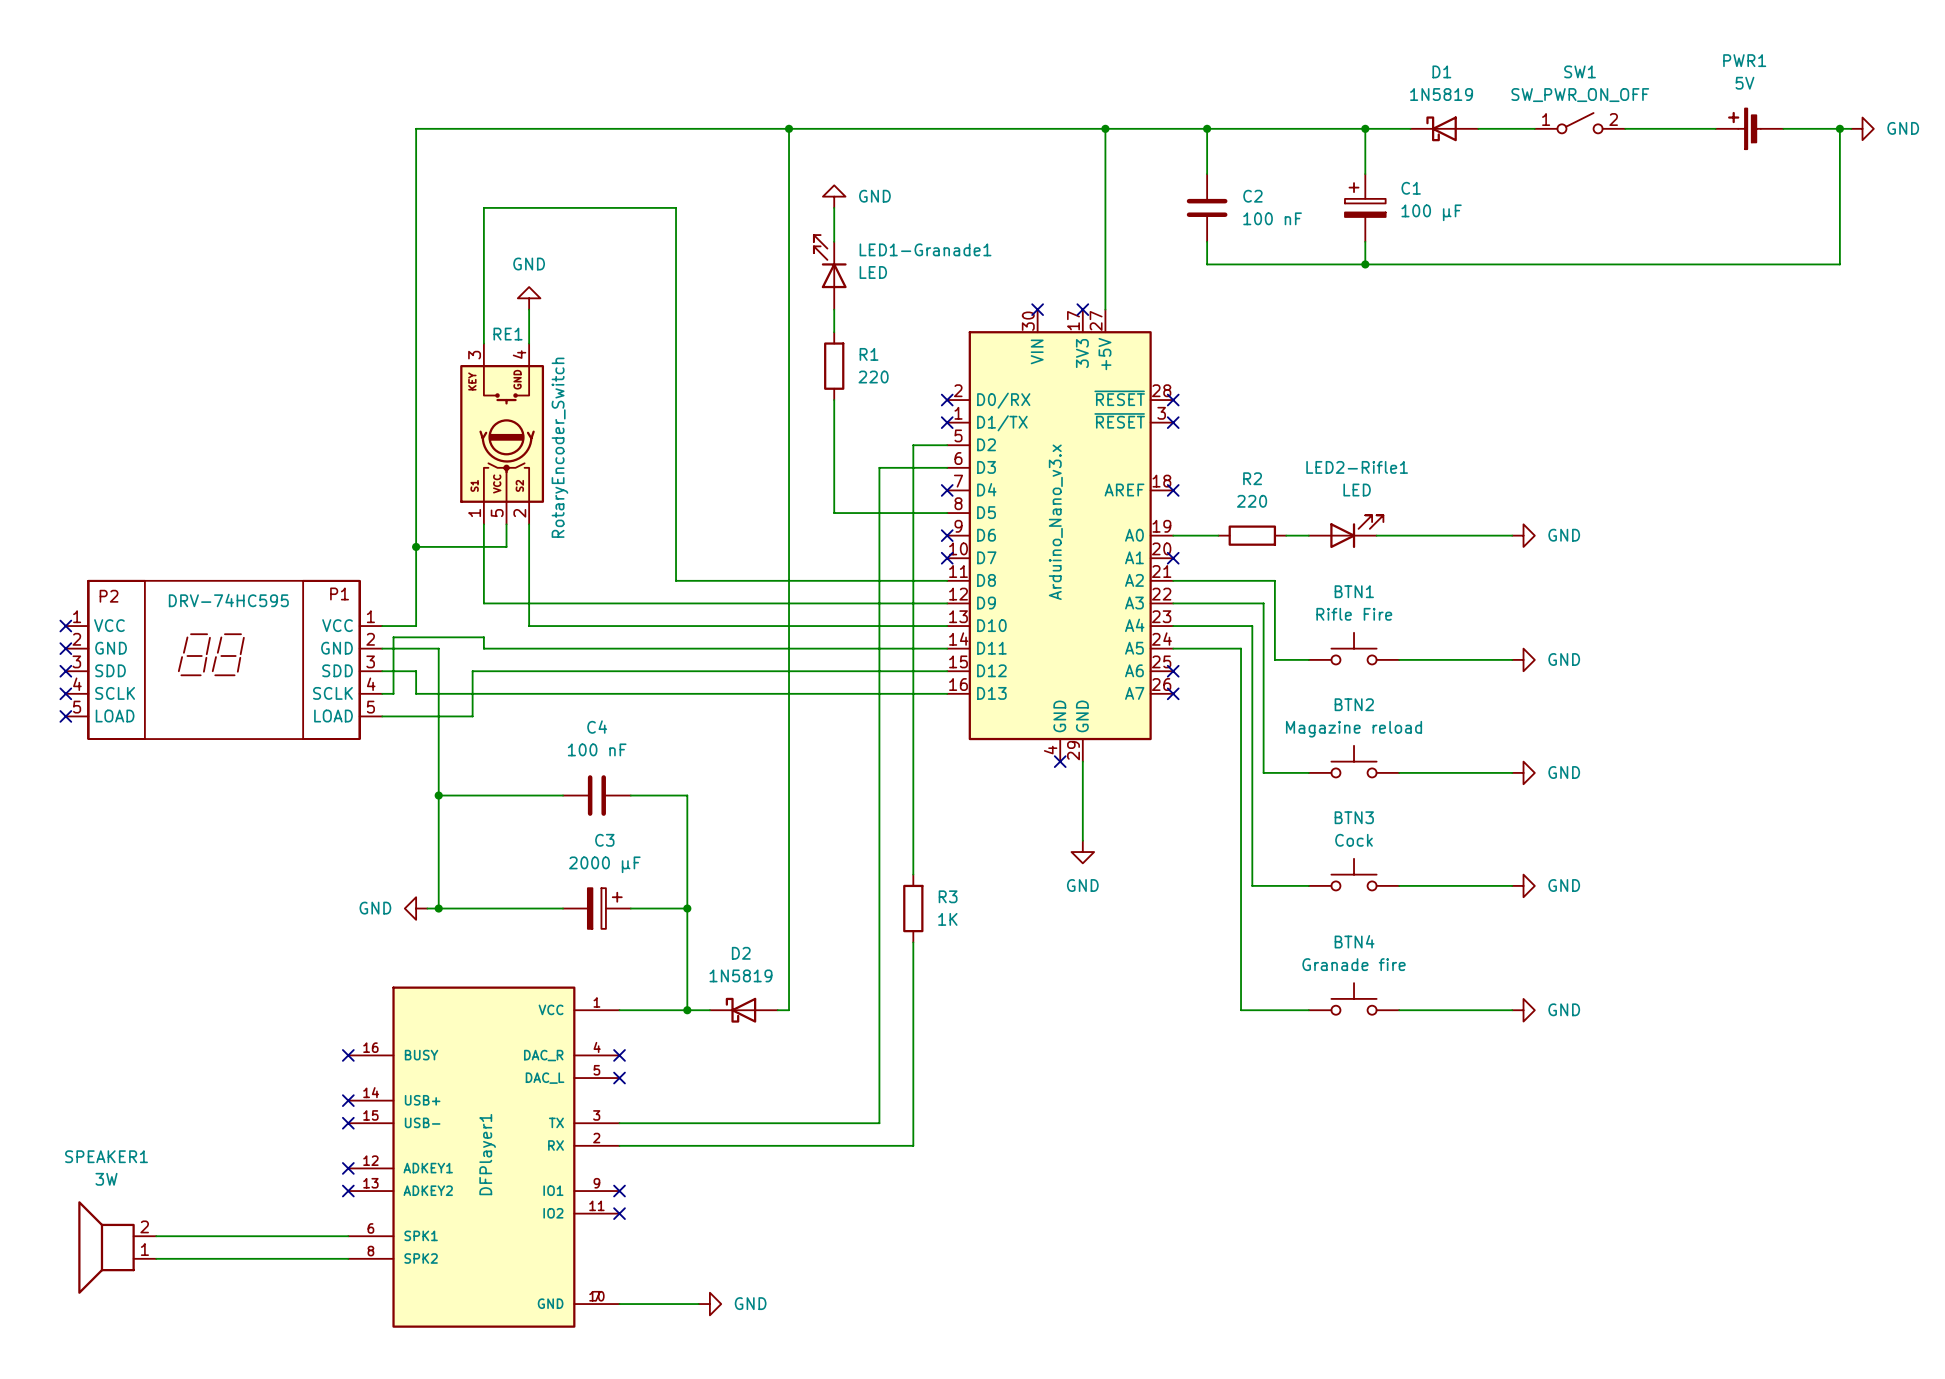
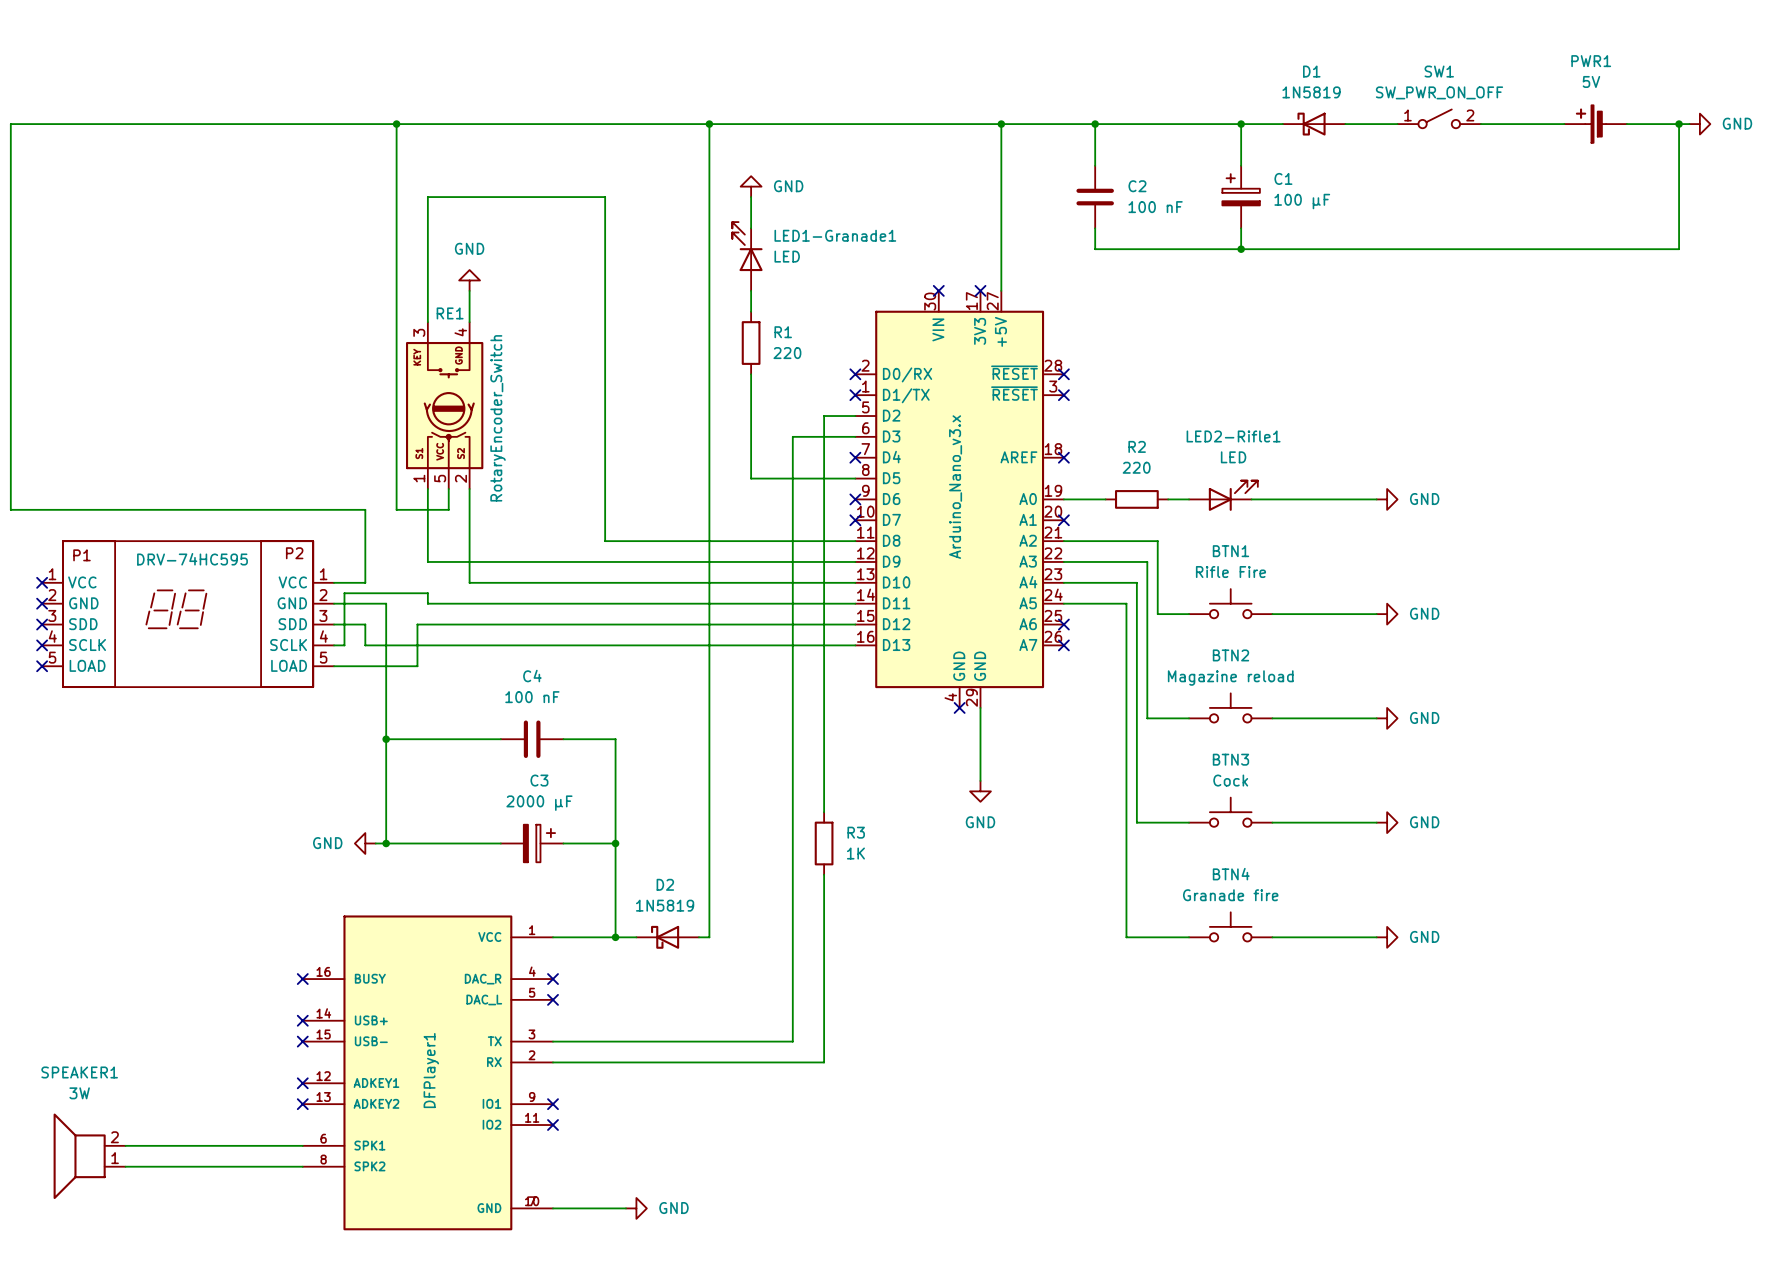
wire: (416, 128) (416, 546) (450, 546) -> (365, 124) (10, 124) (10, 509) (365, 509)
wire: none -> (396, 124) (396, 509)
junction: none -> (396, 124)
junction: (416, 546) -> none
DRV-74HC595 text: P1 (339, 593) -> P2 (294, 553)
DRV-74HC595 text: P2 (109, 596) -> P1 (81, 555)

